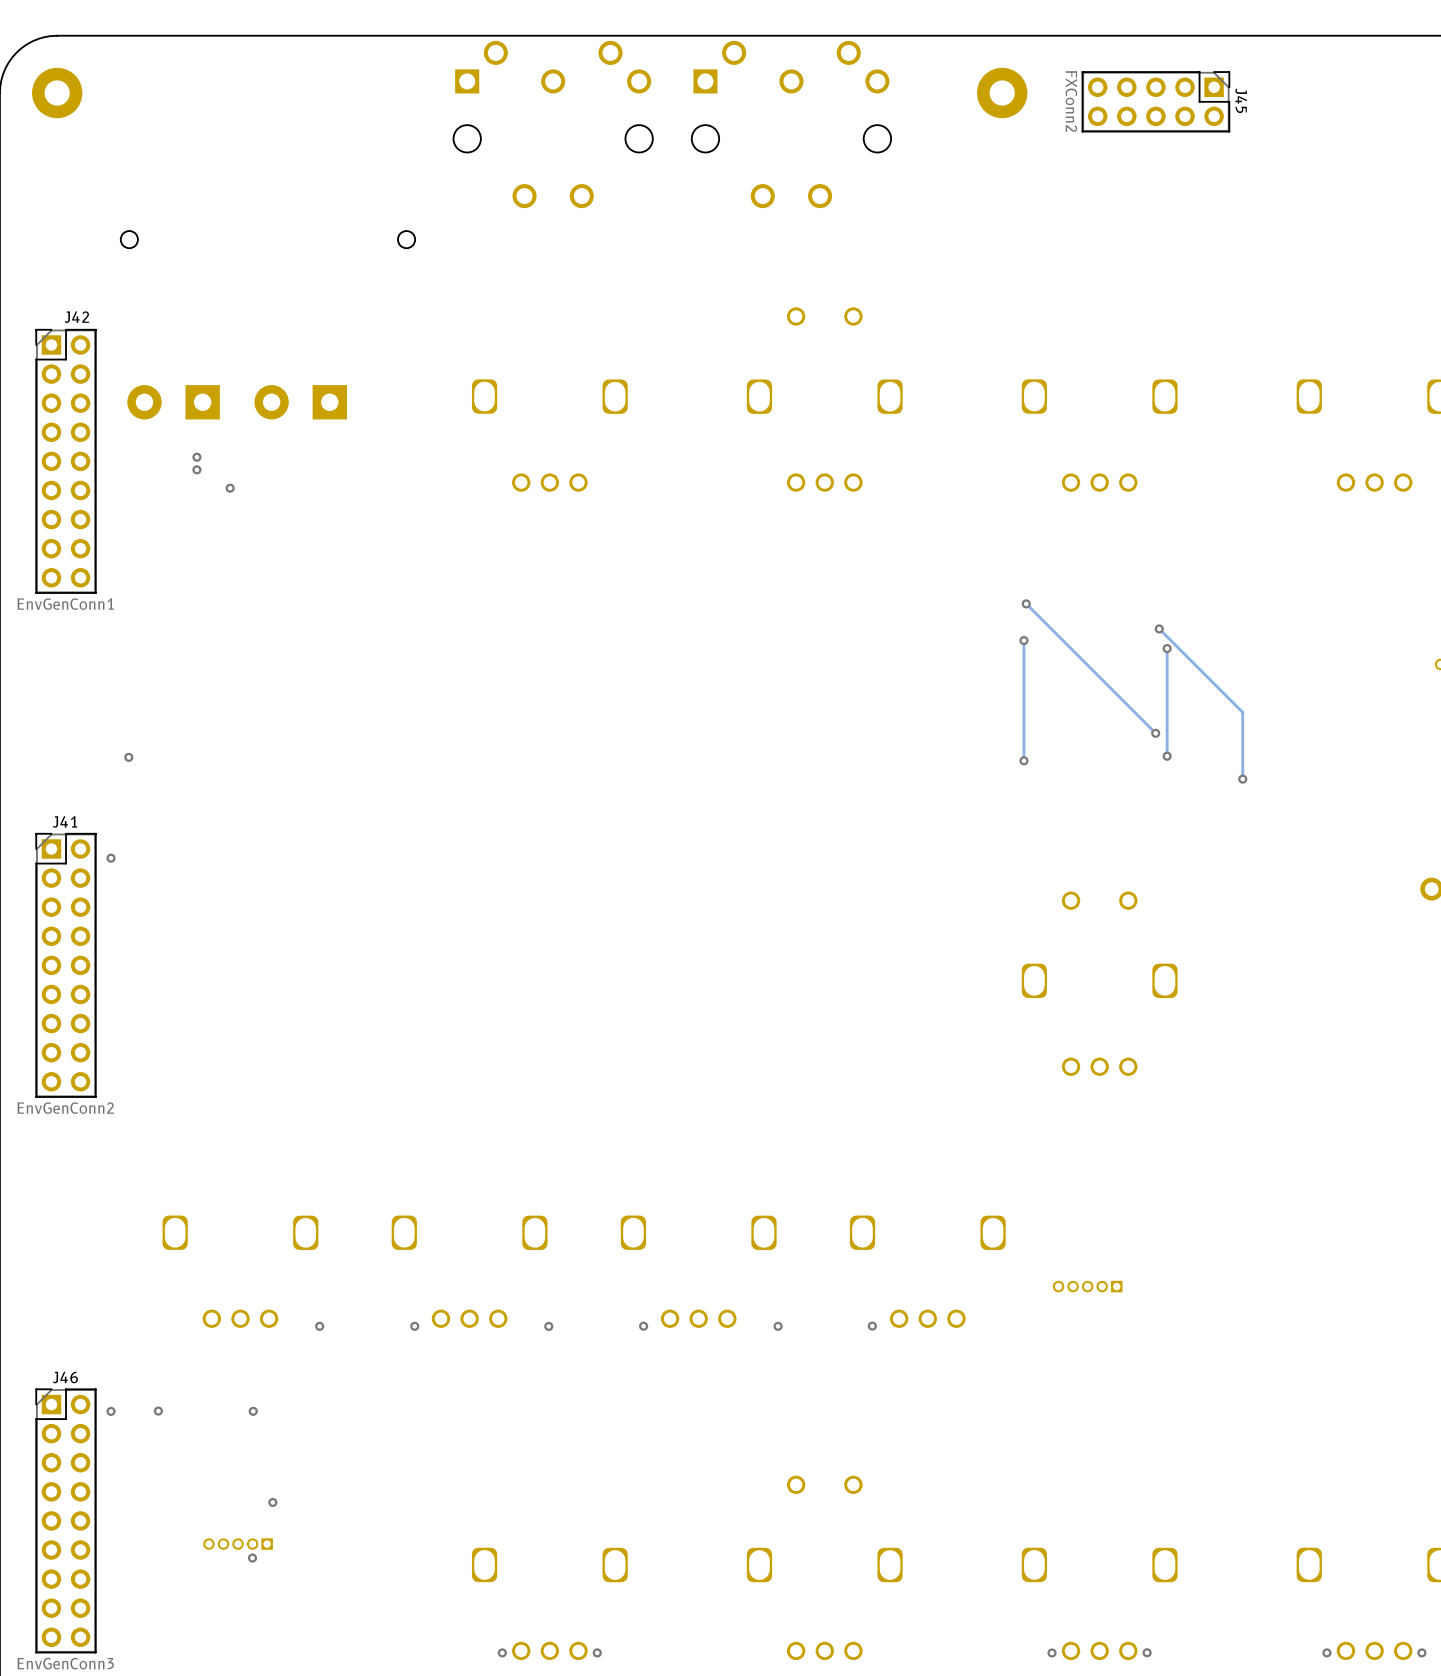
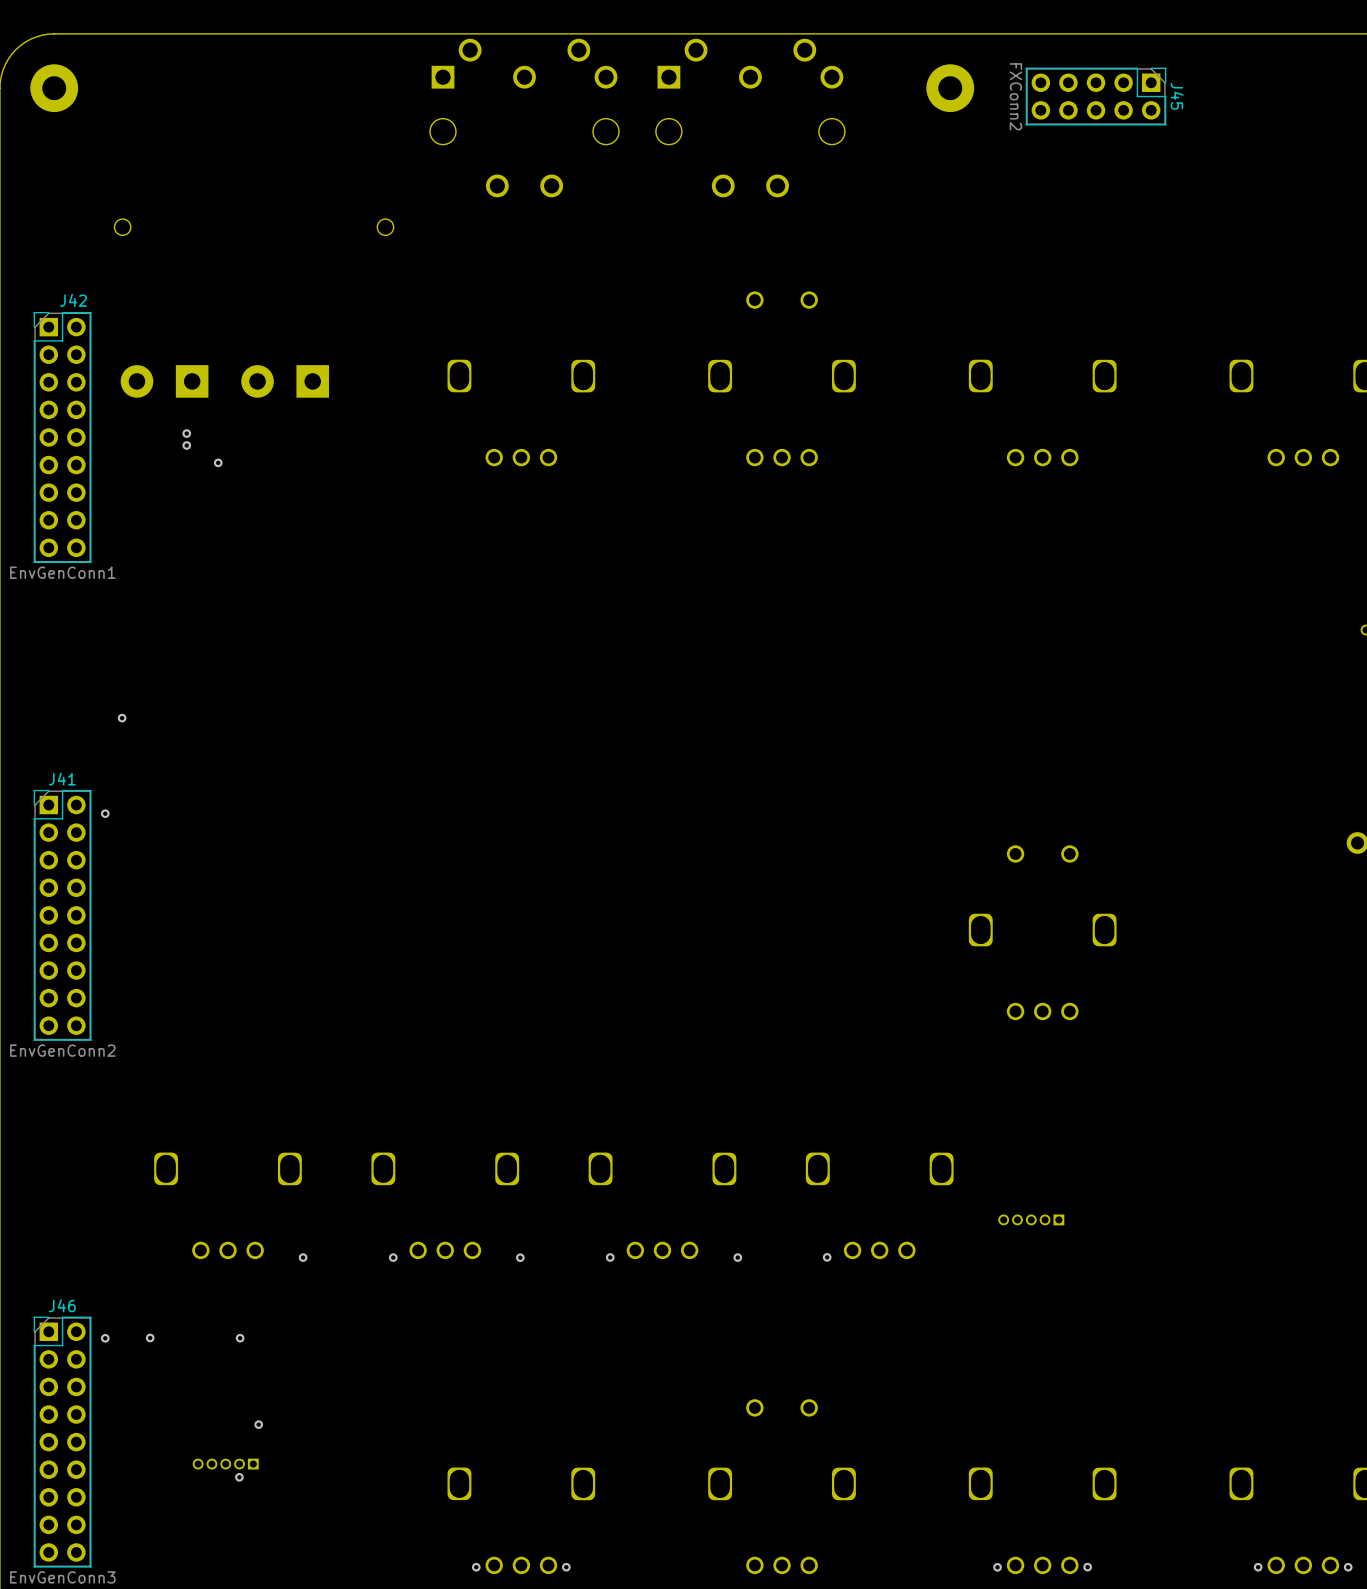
track: (1026, 603) (1155, 733) -> none
via: (1026, 603) -> none
track: (1159, 628) (1242, 712) (1242, 779) -> none
via: (1159, 628) -> none
track: (1023, 640) (1023, 760) -> none
via: (1023, 640) -> none
track: (1167, 648) (1167, 756) -> none
via: (1167, 648) -> none
via: (1155, 733) -> none
via: (1167, 756) -> none
via: (1023, 760) -> none
via: (1242, 779) -> none

